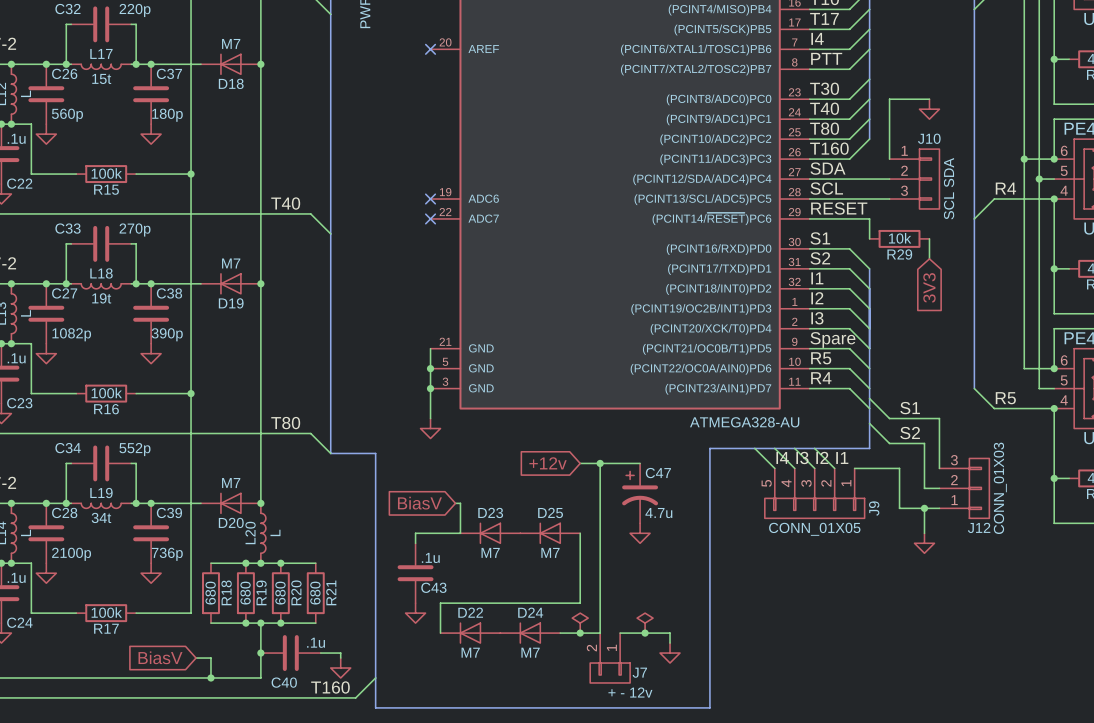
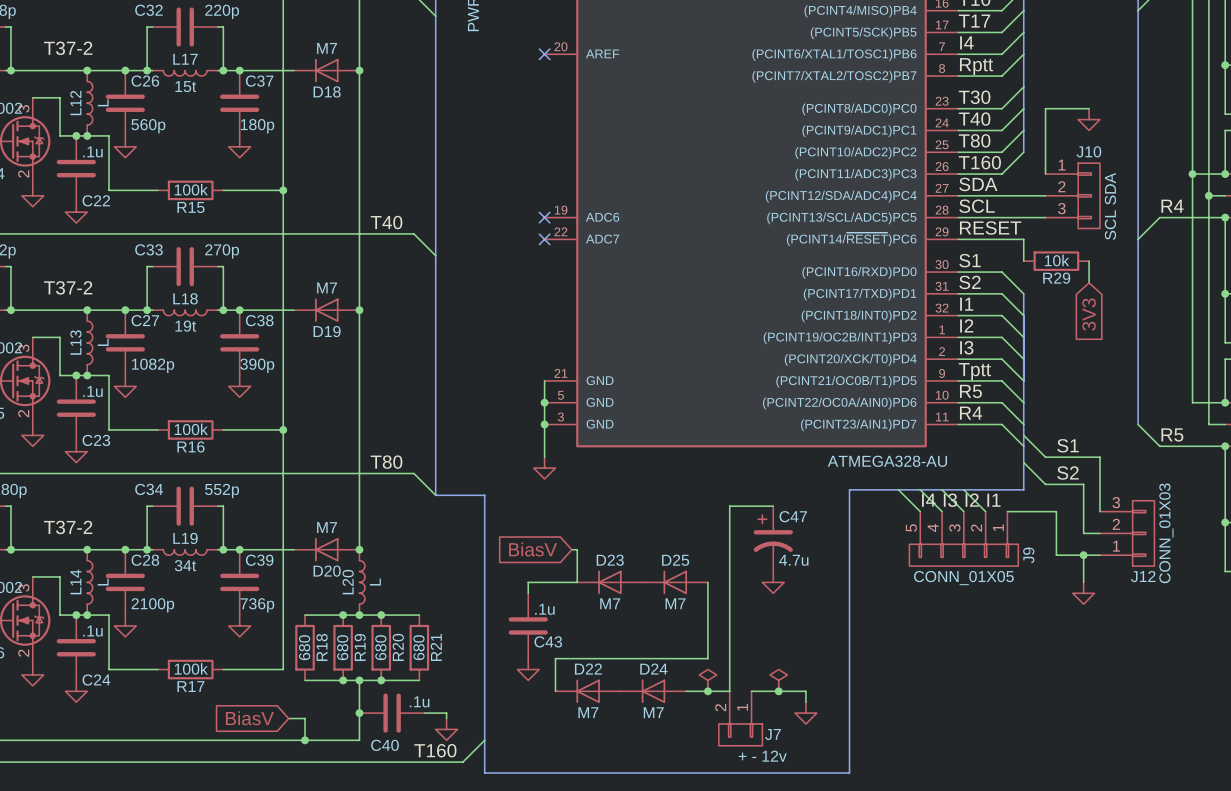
label: PTT (826, 58) -> Rptt (976, 66)
label: Spare (832, 339) -> Tptt (974, 371)
global label: +12v (548, 463) -> none
wire: (580, 463) (600, 463) -> none
junction: (600, 463) -> none

